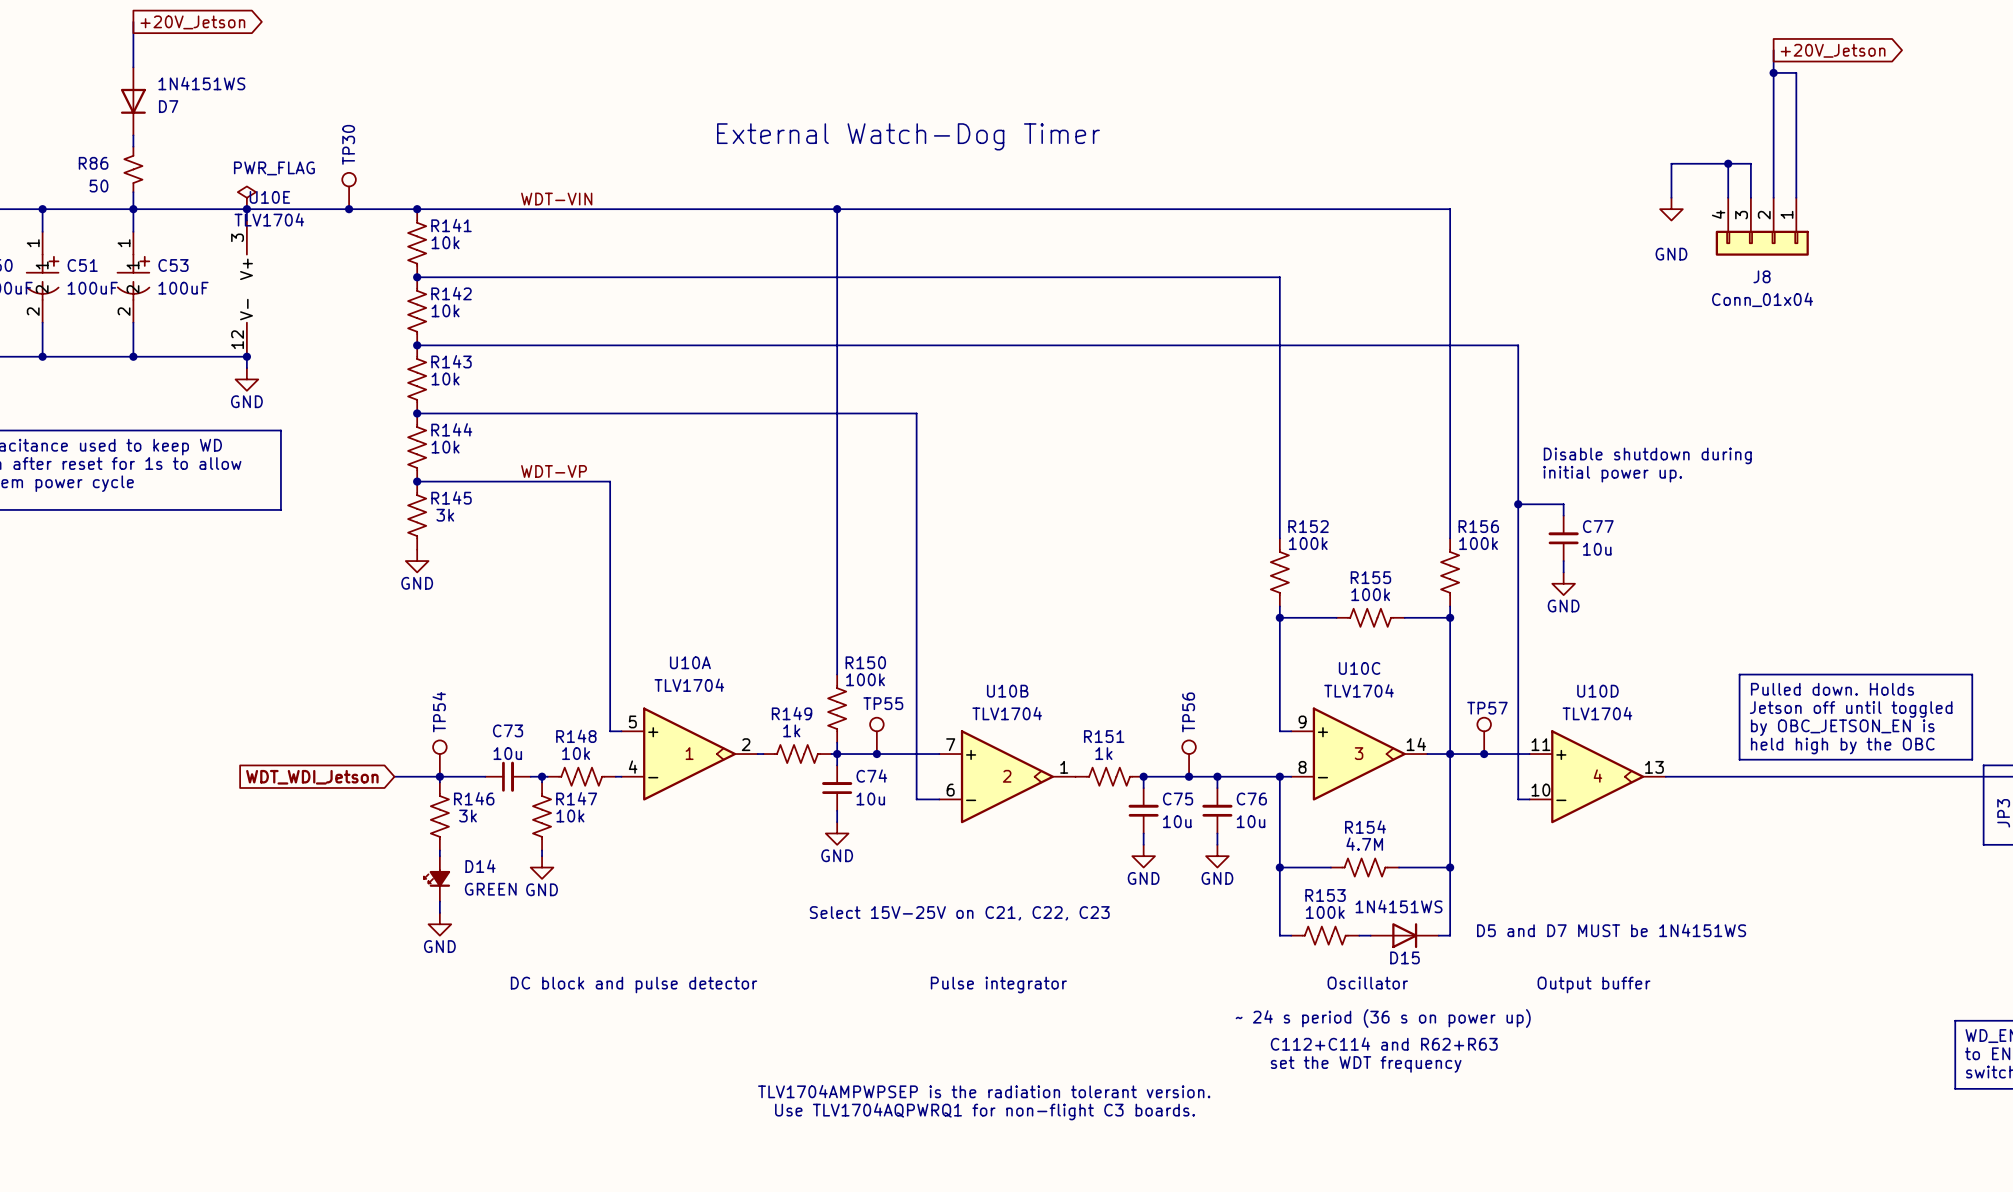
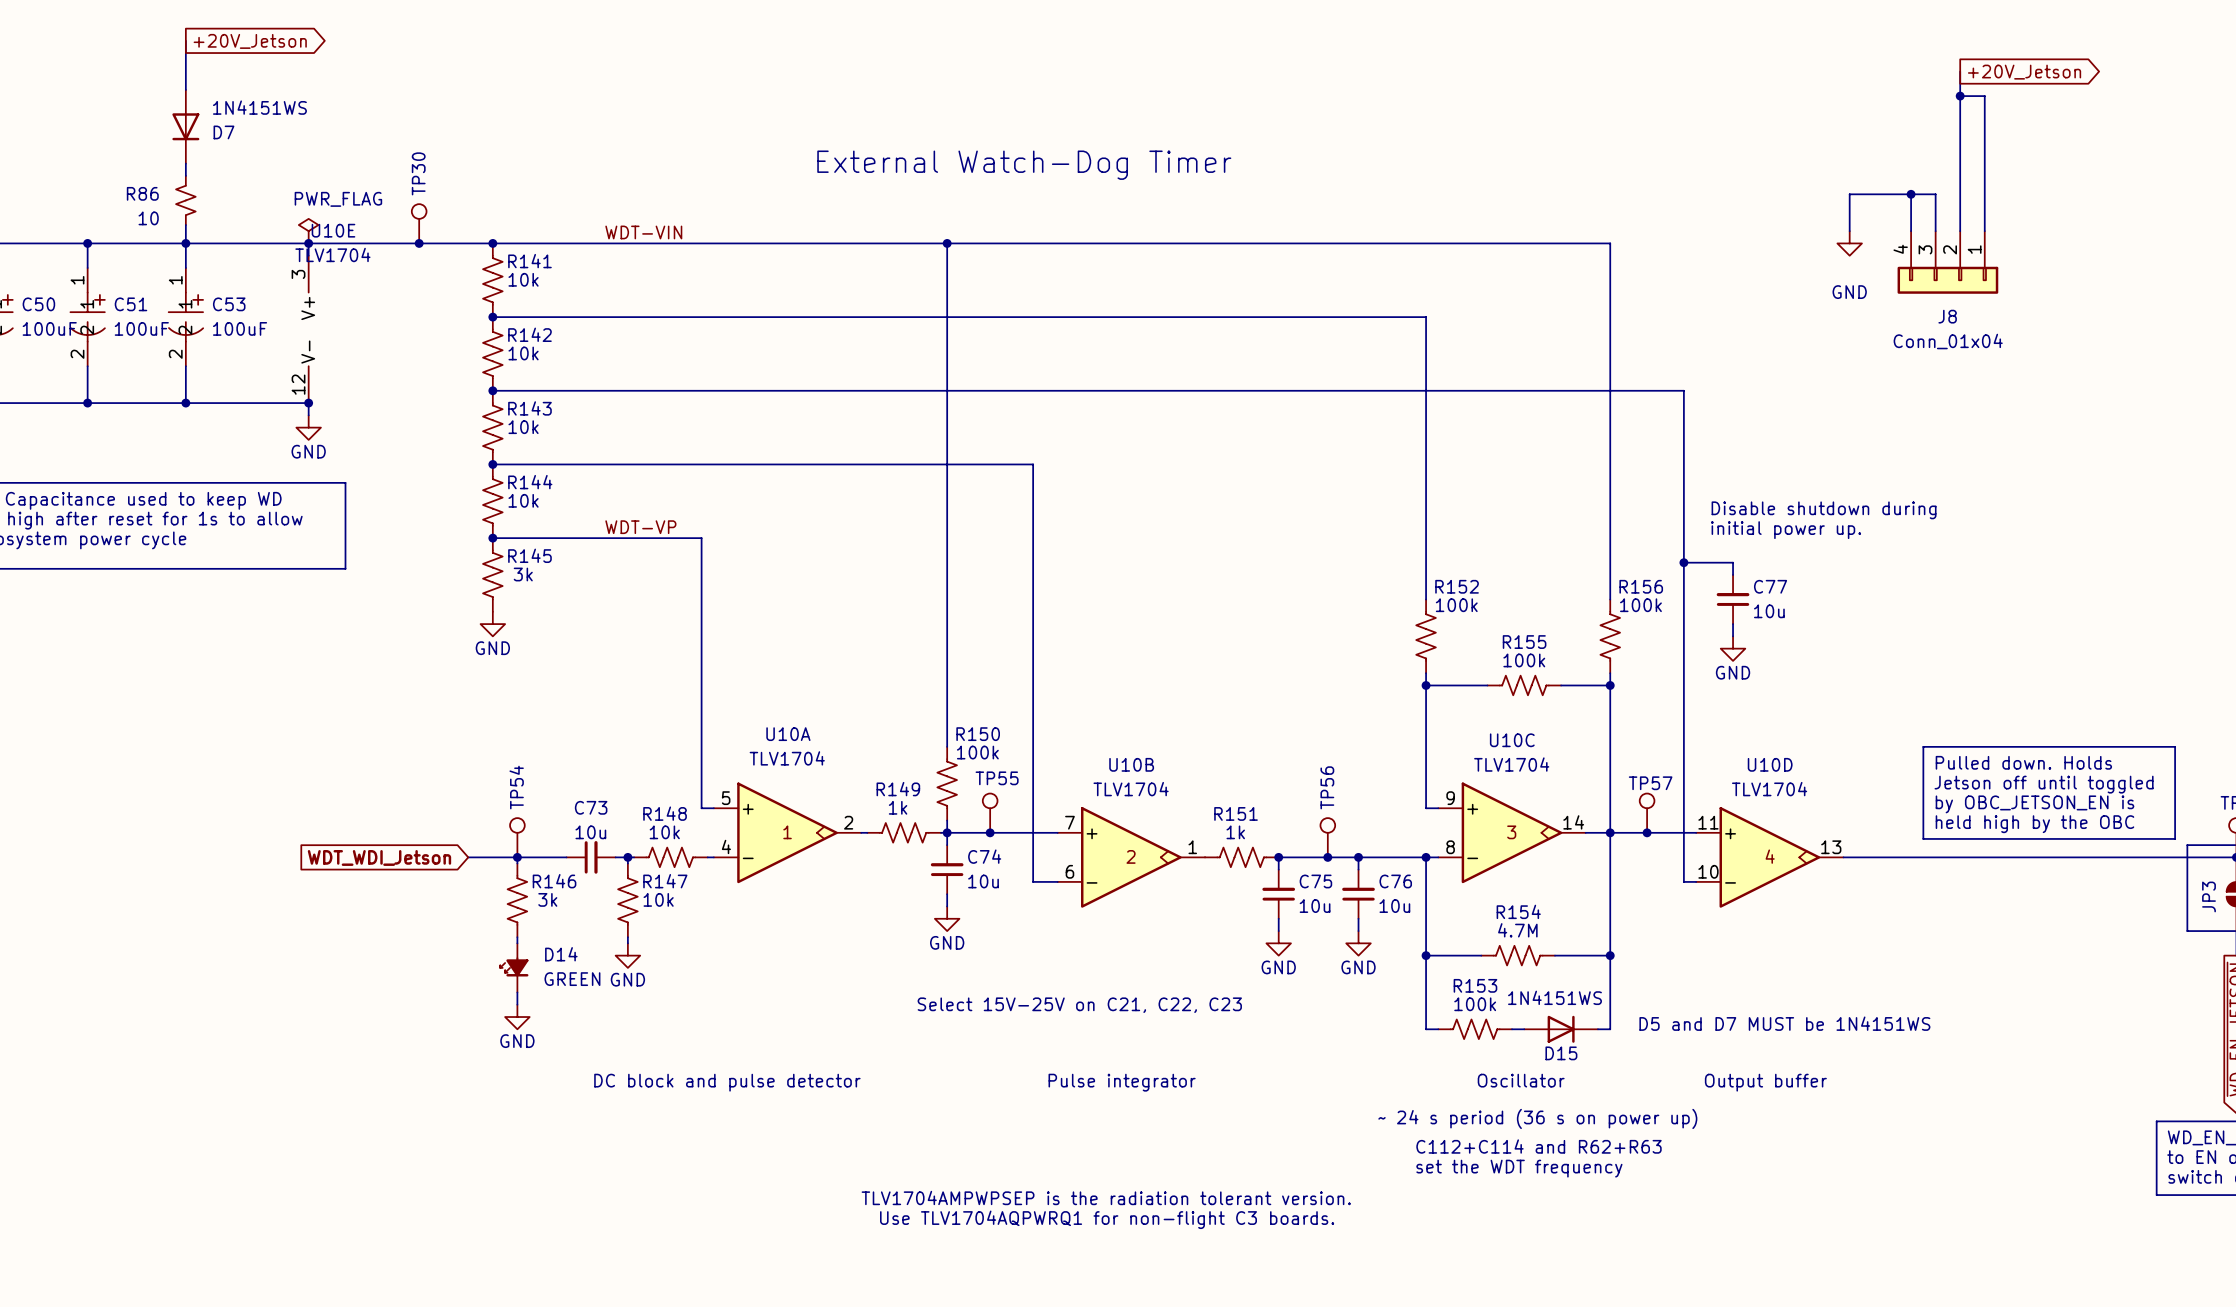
R86 value: 50 (98, 186) -> 10 (148, 218)

